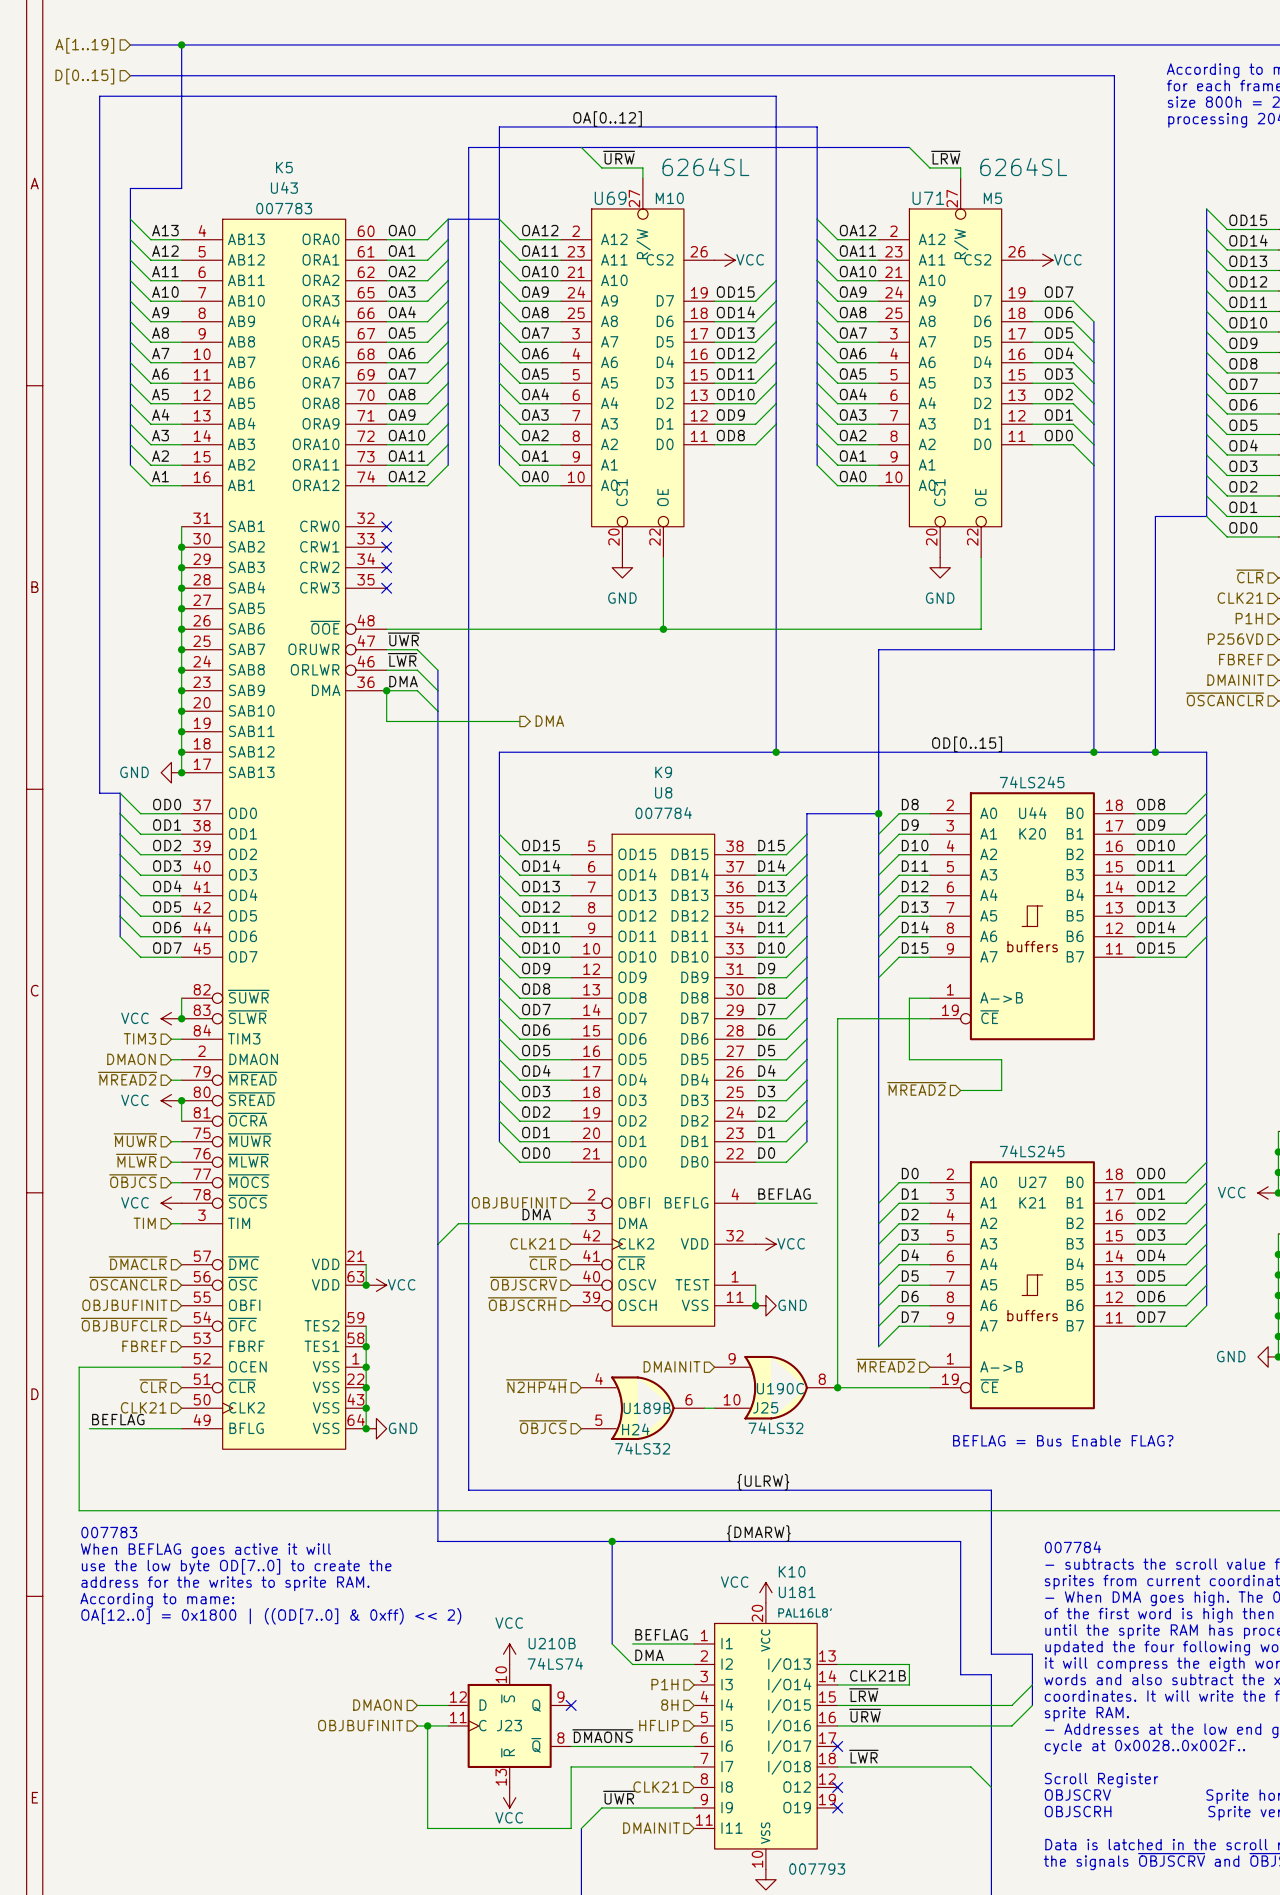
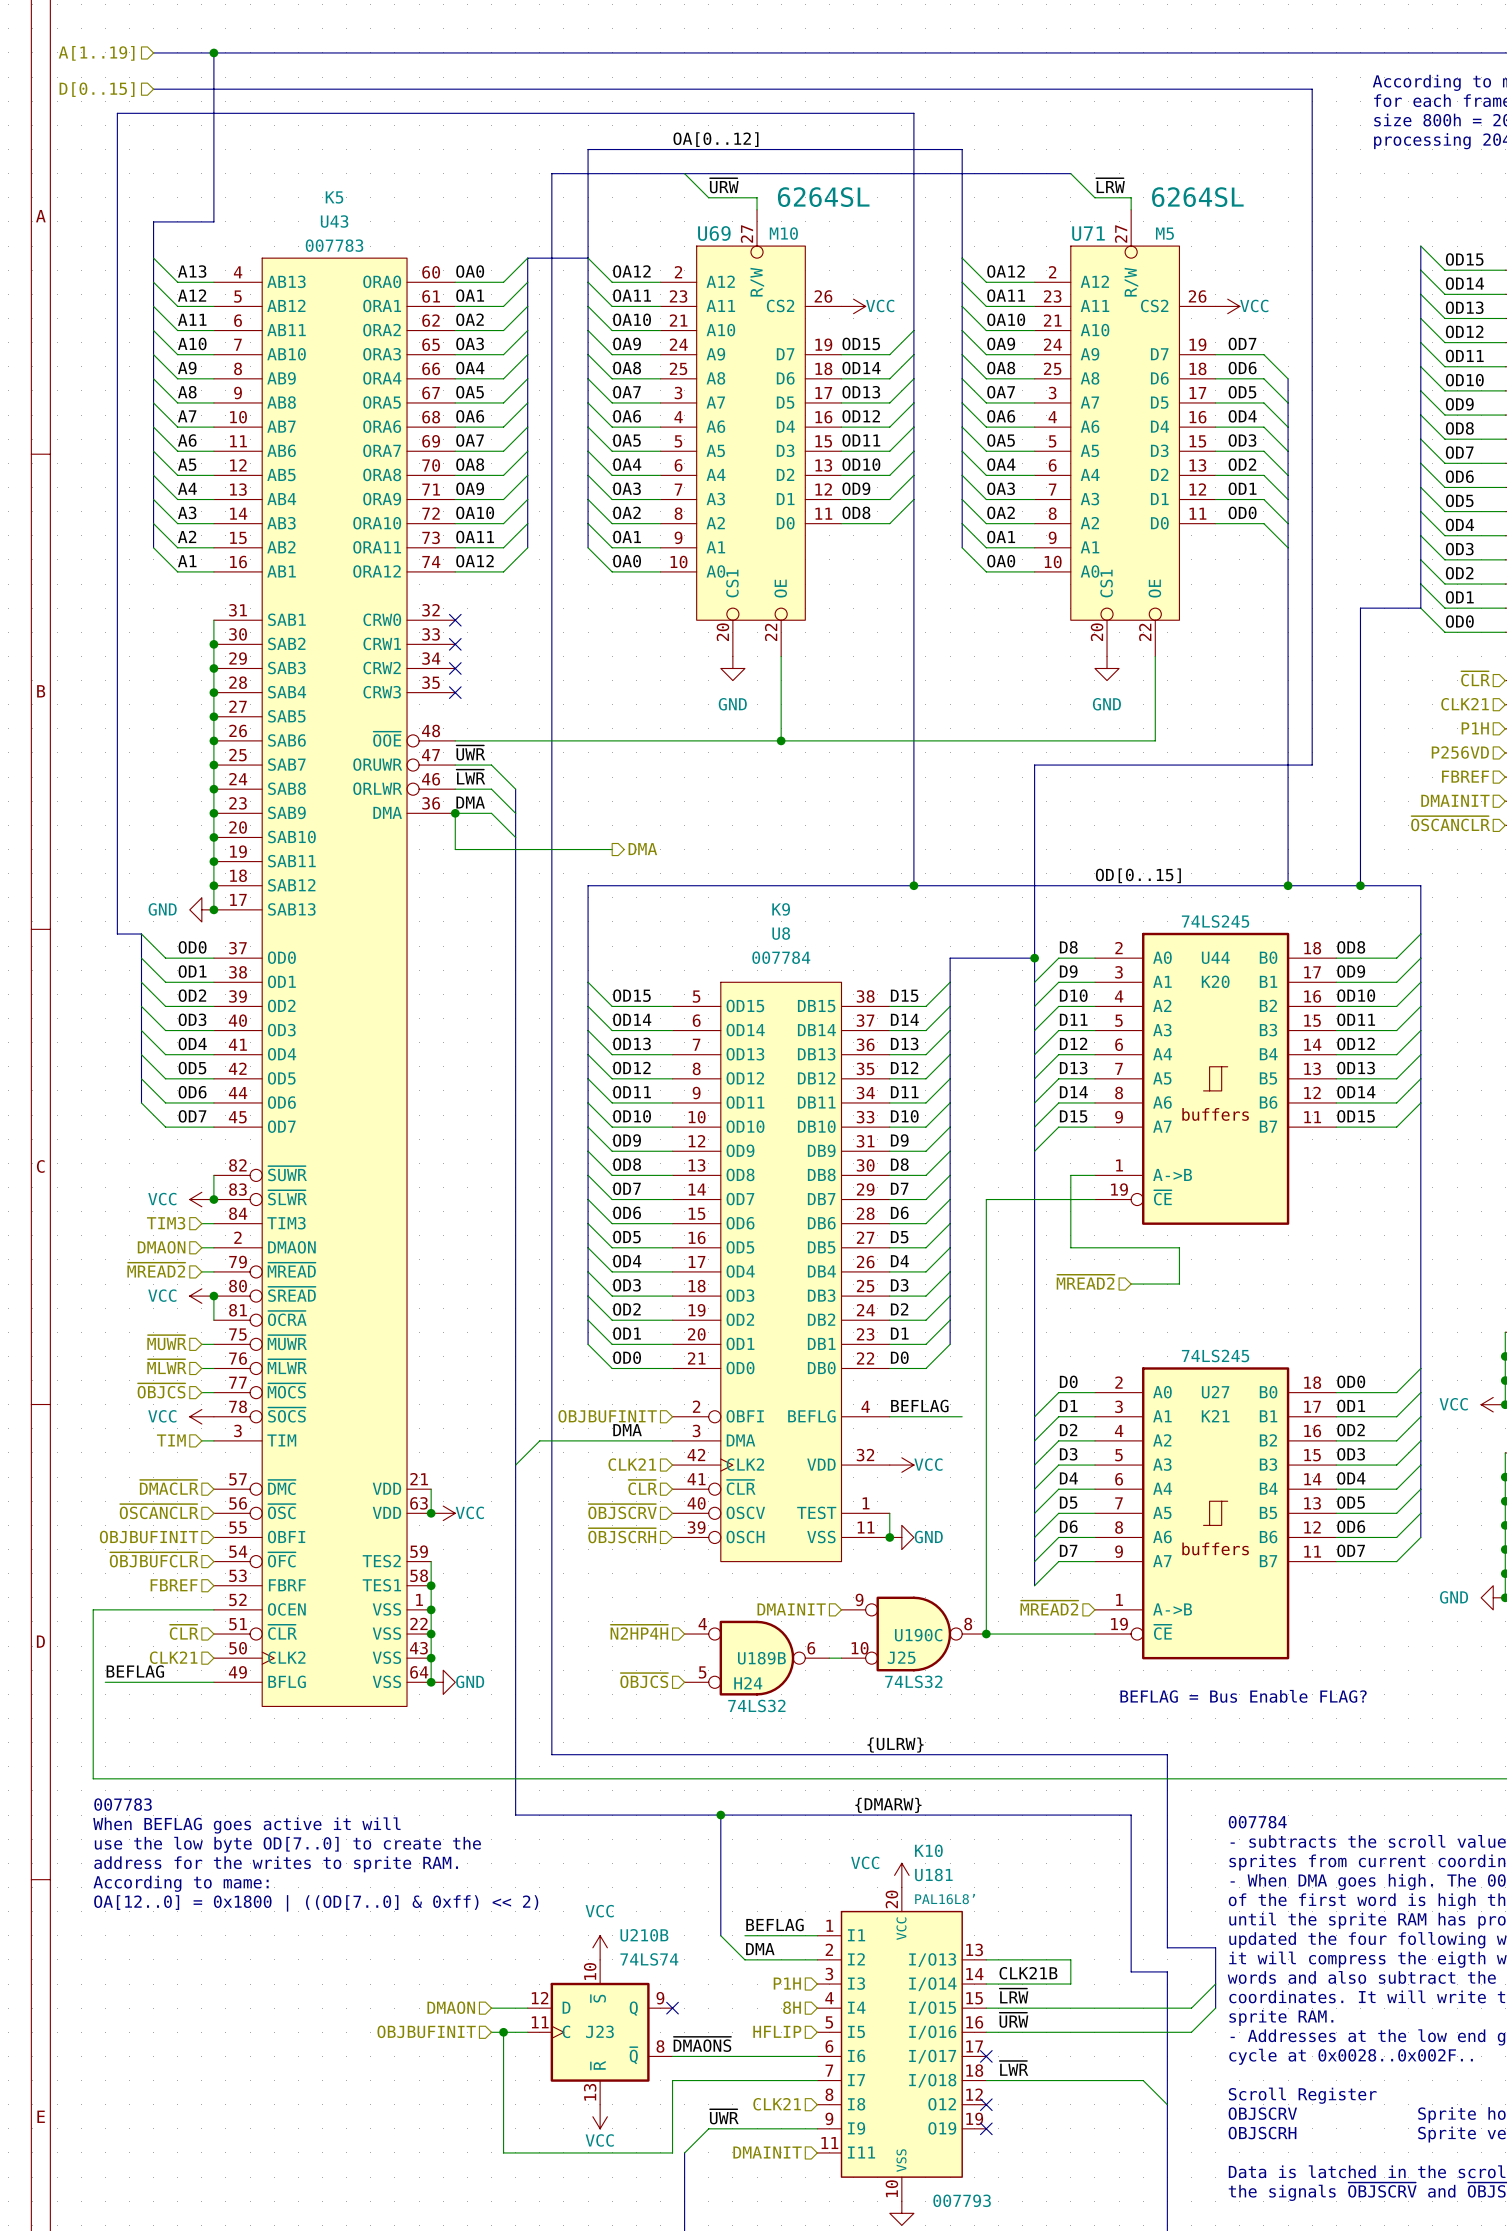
U190C symbol: [714, 1355, 838, 1420] -> [841, 1596, 987, 1672]
U189B symbol: [581, 1376, 705, 1441] -> [684, 1620, 830, 1696]

